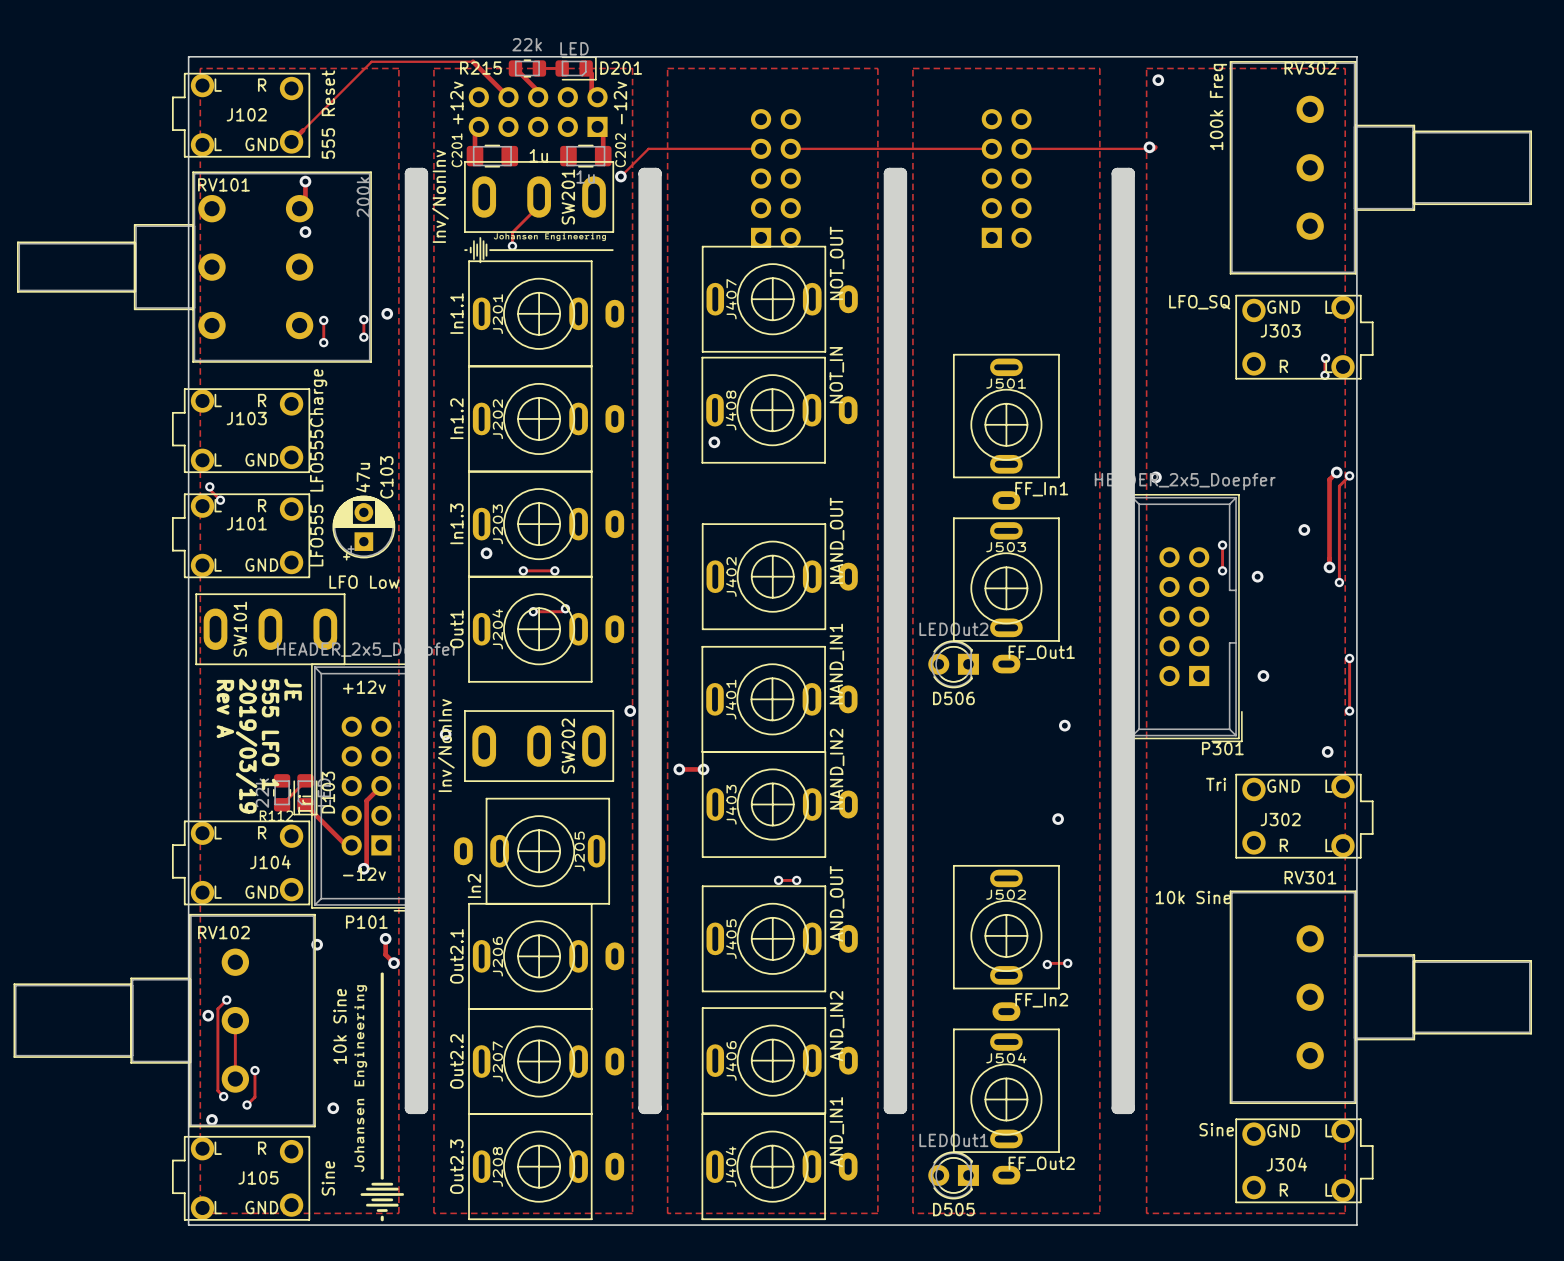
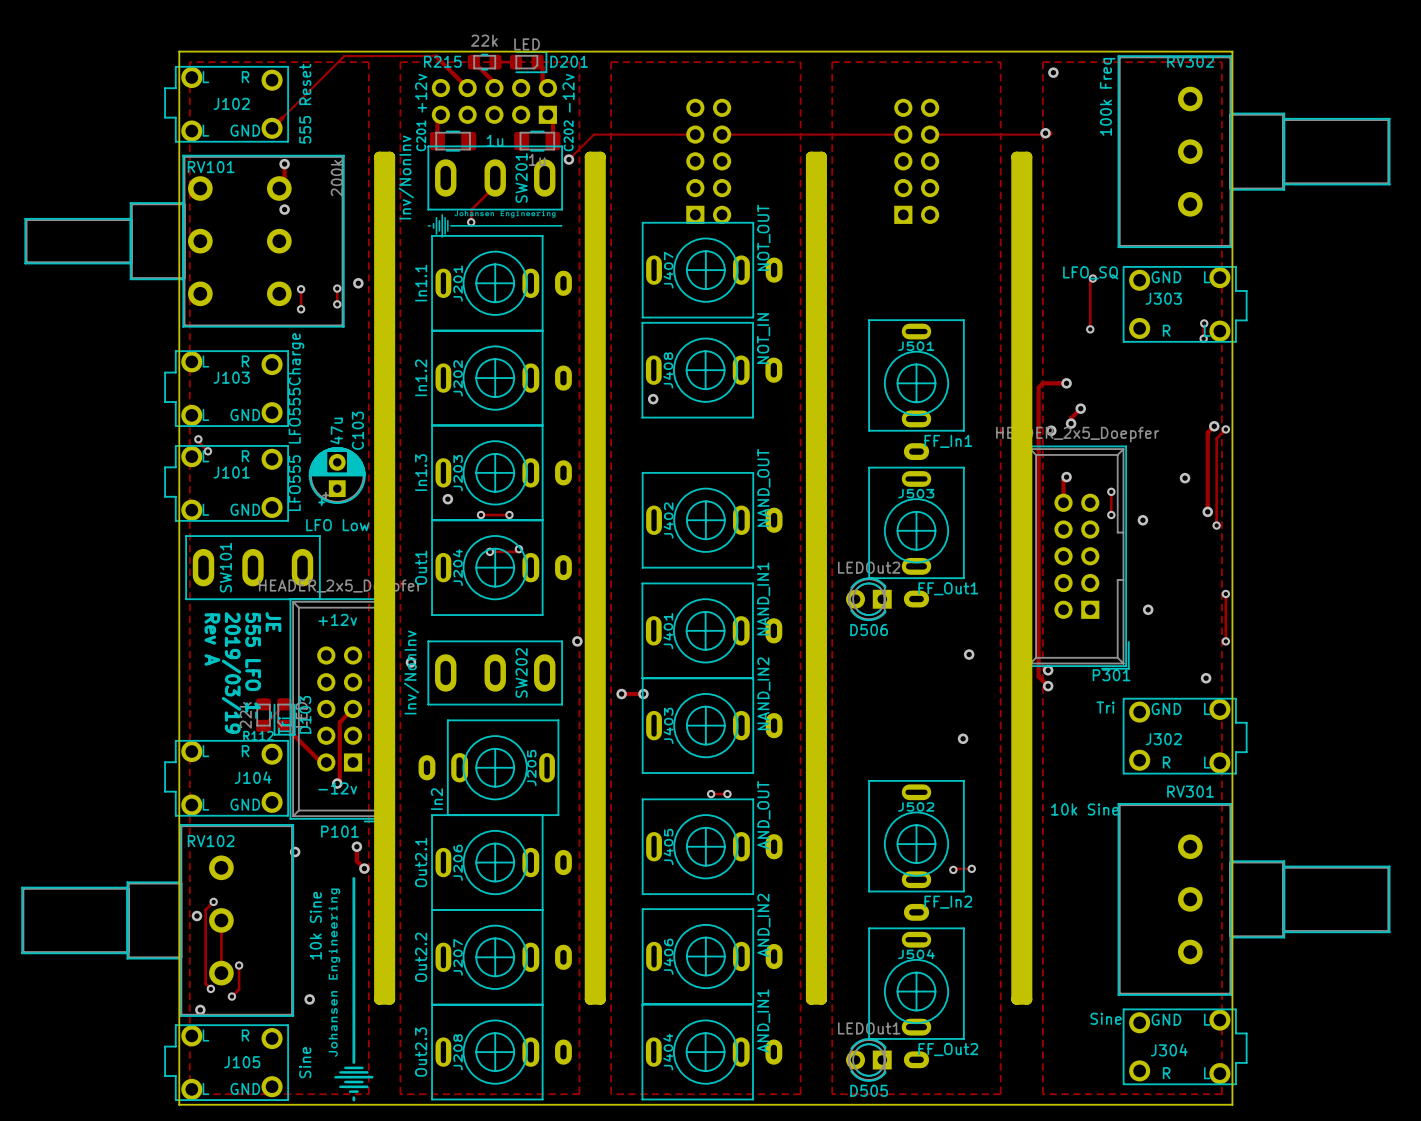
track: none -> (1092, 278) (1090, 281) (1090, 329)
via: none -> (1092, 278)
via: none -> (1090, 329)
track: none -> (1066, 383) (1042, 383) (1038, 387) (1038, 676) (1048, 686)
via: none -> (1066, 383)
track: none -> (1080, 408) (1071, 418) (1071, 423)
via: none -> (1080, 408)
via: none -> (1071, 423)
track: none -> (1066, 477) (1063, 480) (1063, 502)
via: none -> (1066, 477)
via: none -> (1048, 670)
via: none -> (1048, 686)

